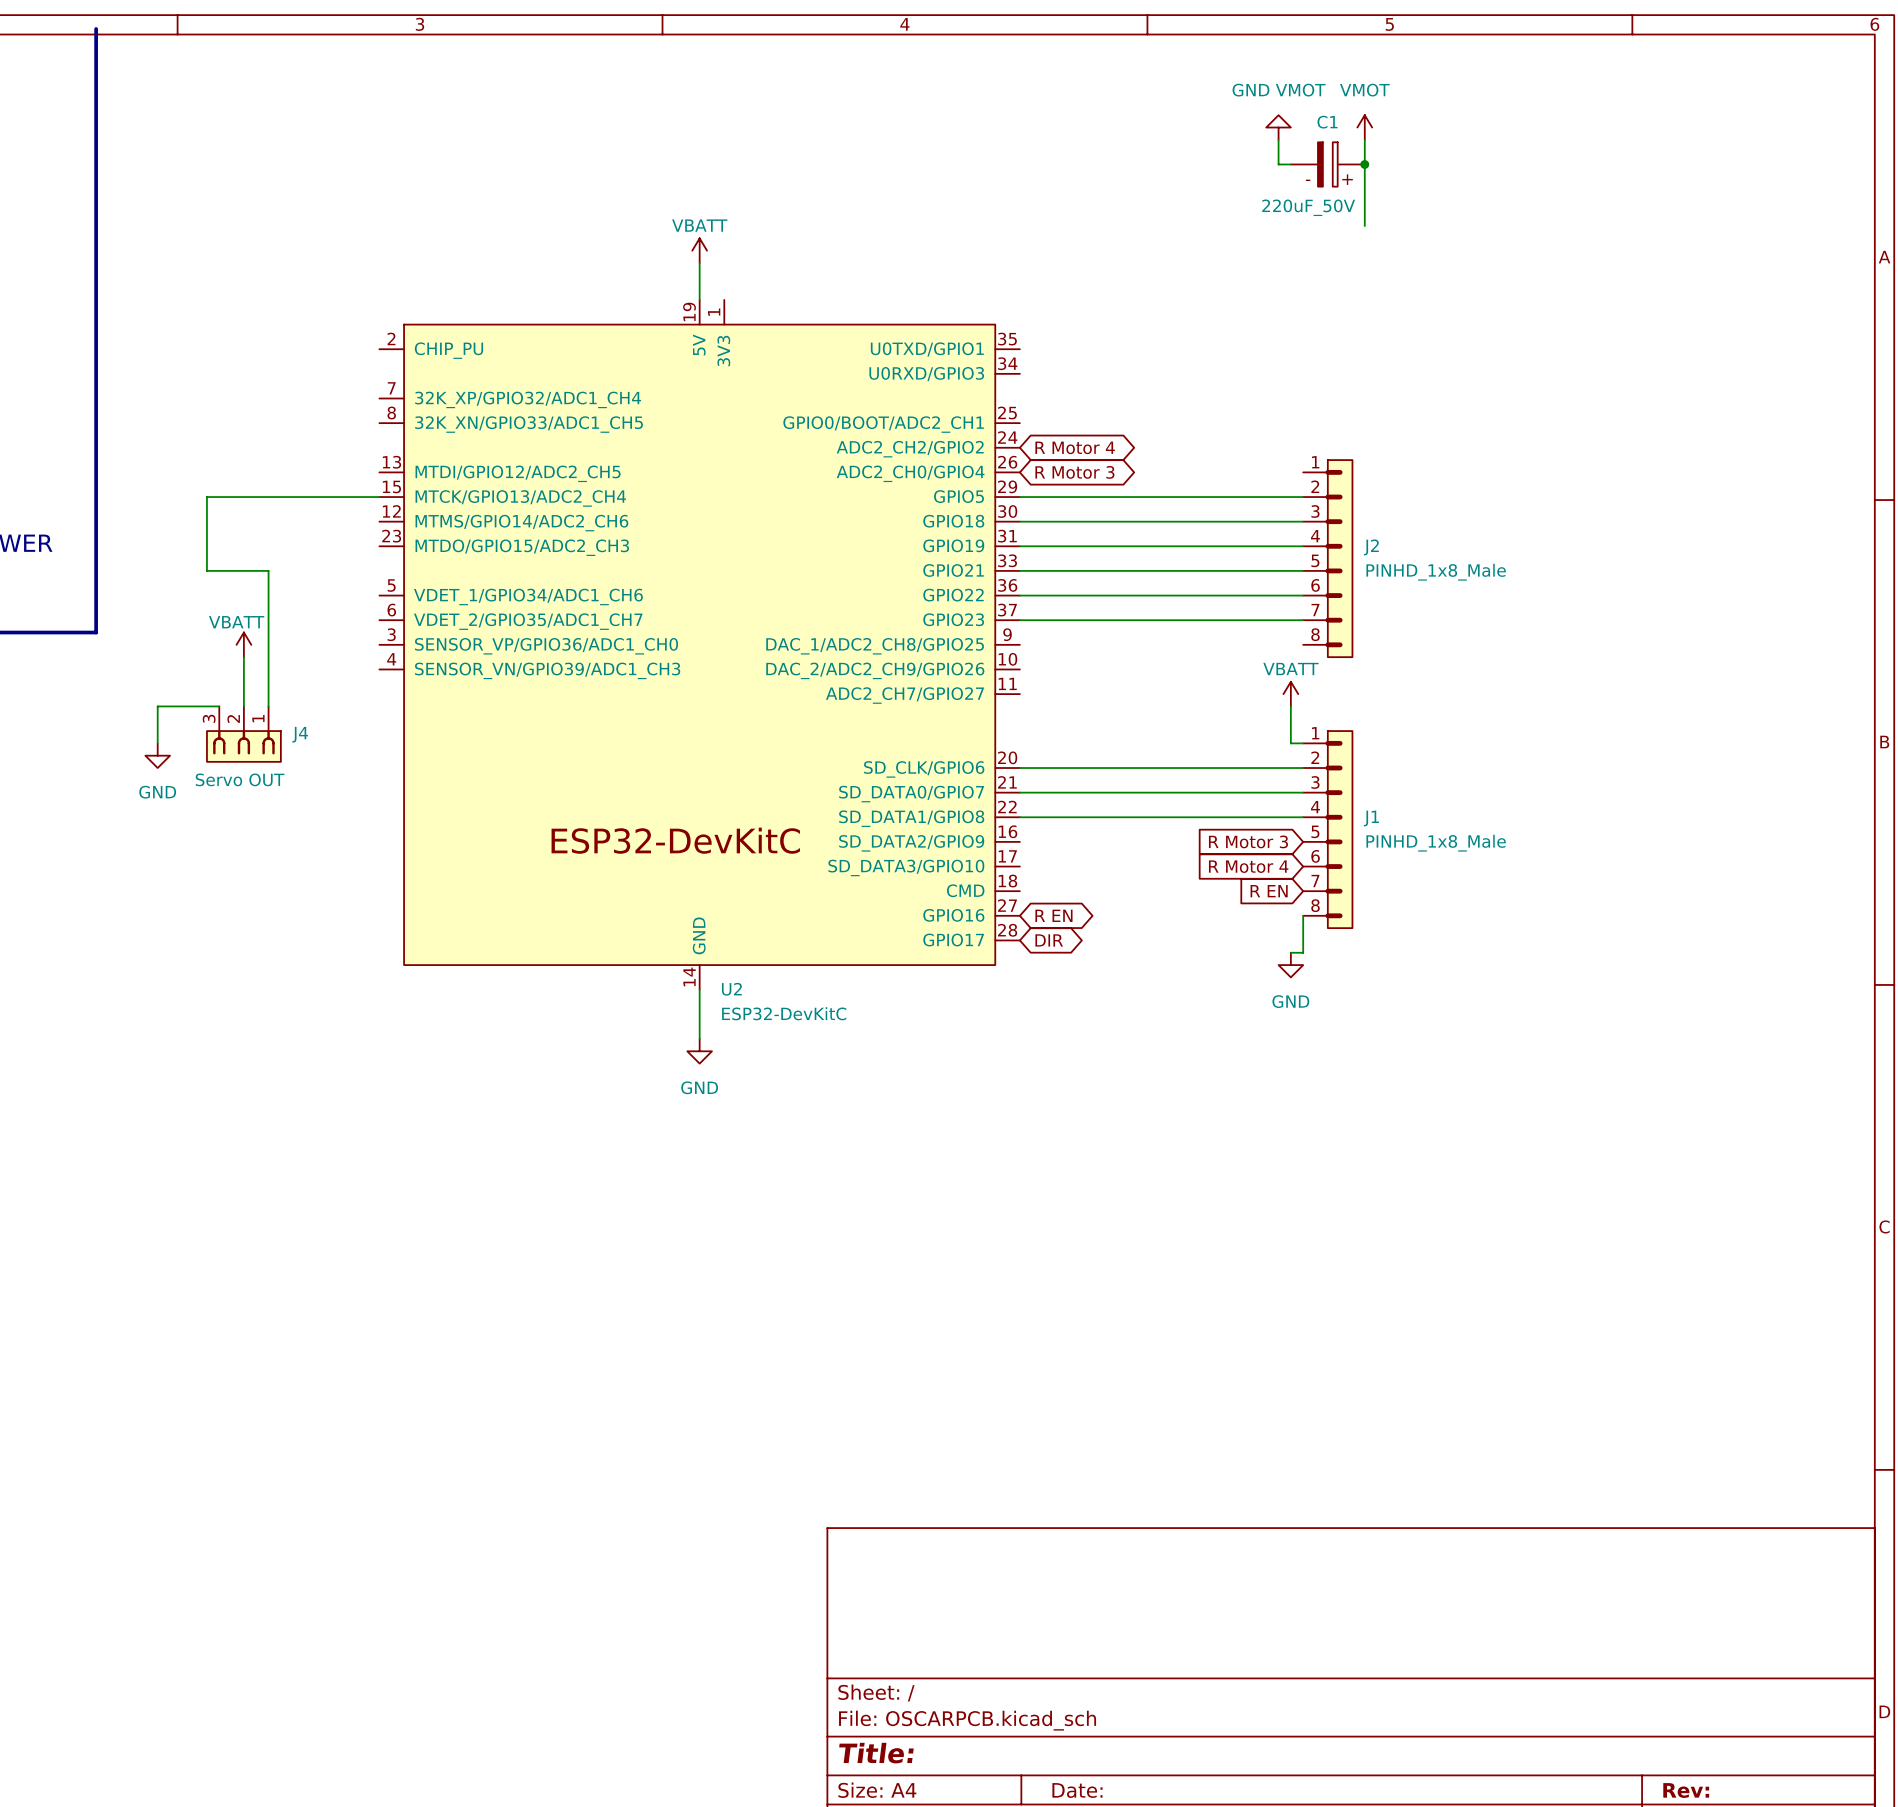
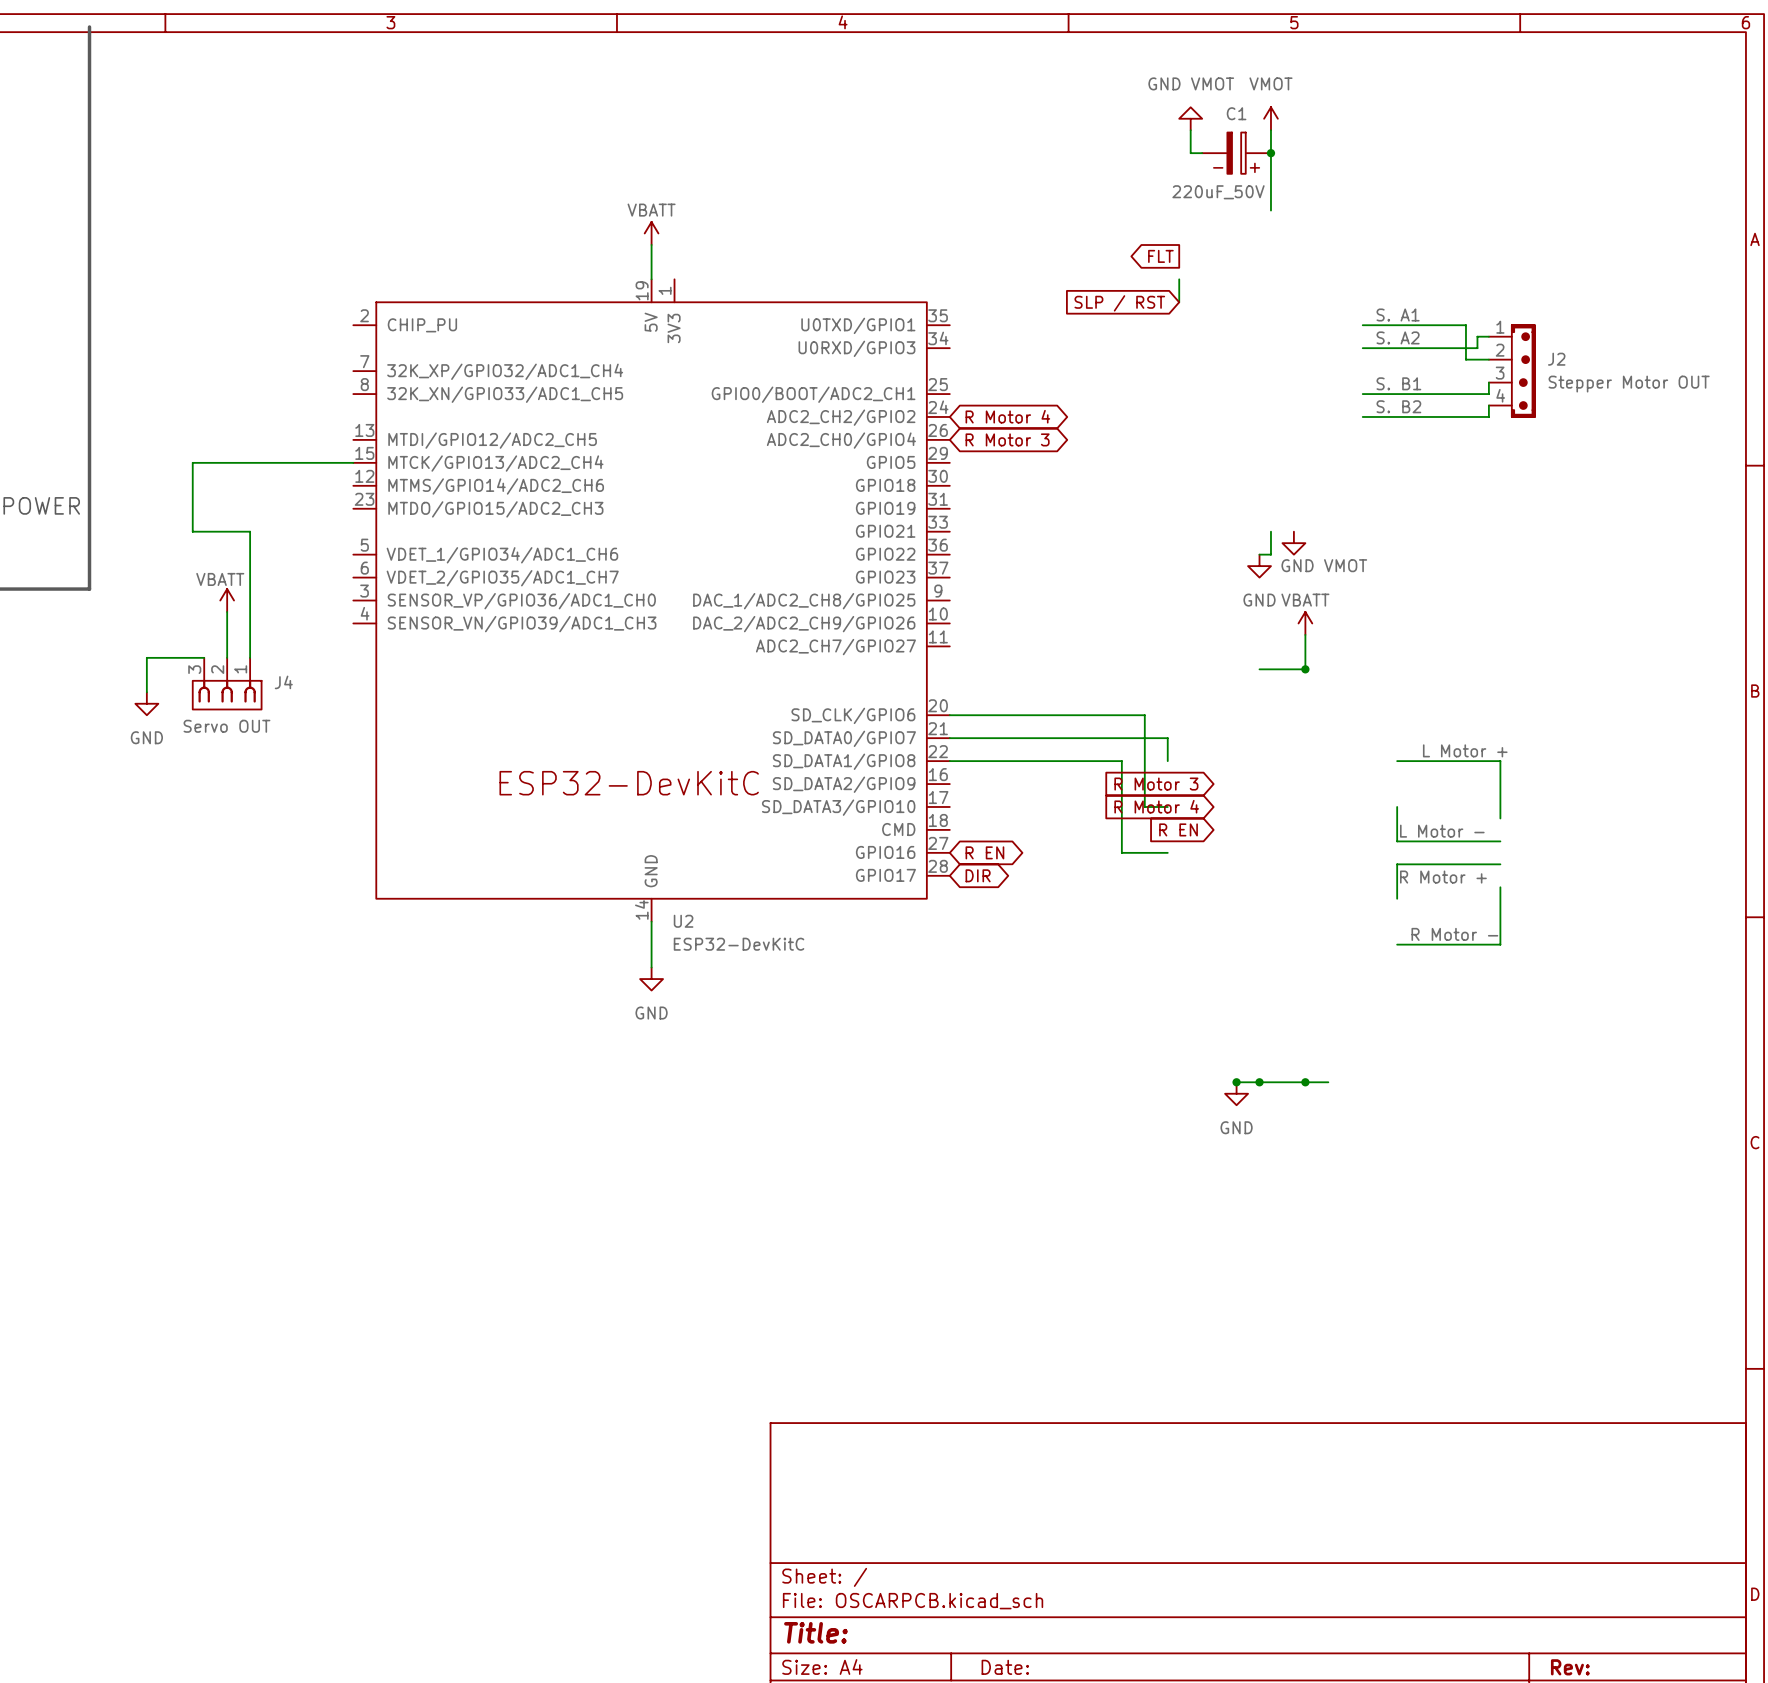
global label: none -> FLT (1160, 256)
wire: none -> (1179, 279) (1179, 302)
global label: none -> SLP / RST (1119, 303)
label: none -> S. A1 (1398, 314)
wire: none -> (1362, 325) (1465, 325) (1465, 359) (1488, 359)
wire: none -> (1488, 336) (1477, 336) (1477, 348) (1362, 348)
label: none -> S. A2 (1398, 337)
wire: none -> (1488, 382) (1488, 394) (1362, 394)
label: none -> S. B1 (1398, 383)
wire: none -> (1488, 405) (1488, 416) (1362, 416)
label: none -> S. B2 (1398, 406)
J2 symbol: [1303, 460, 1353, 658] -> [1488, 325, 1535, 417]
wire: (1019, 497) (1303, 497) -> none
wire: (1019, 521) (1303, 521) -> none
wire: (1019, 546) (1303, 546) -> none
wire: (1019, 570) (1303, 570) -> none
wire: none -> (1270, 531) (1270, 554) (1259, 554)
J2 value: PINHD_1x8_Male (1436, 572) -> Stepper Motor OUT (1629, 384)
power symbol: none -> GND VMOT (1293, 543)
wire: (1019, 595) (1303, 595) -> none
power symbol: none -> GND (1259, 566)
wire: (1019, 620) (1303, 620) -> none
wire: none -> (1305, 634) (1305, 669) (1259, 669)
power symbol position: VBATT (1290, 694) -> VBATT (1305, 623)
wire: (1290, 706) (1290, 743) (1303, 743) -> none
junction: none -> (1305, 669)
wire: (1229, 768) (1303, 768) -> (1144, 715) (1144, 806) (1167, 806)
wire: (1253, 792) (1303, 792) -> (1167, 738) (1167, 761)
label: none -> L Motor + (1465, 750)
wire: (1204, 817) (1303, 817) -> (1121, 761) (1121, 852) (1167, 852)
wire: none -> (1397, 761) (1500, 761) (1500, 818)
J1: PINHD_1x8_Male (1327, 829) -> none
wire: none -> (1397, 806) (1397, 841) (1500, 841)
label: none -> L Motor - (1442, 831)
wire: (1303, 915) (1303, 952) (1290, 952) -> none
wire: none -> (1500, 864) (1397, 864) (1397, 898)
label: none -> R Motor + (1443, 877)
wire: none -> (1500, 887) (1500, 944) (1397, 944)
power symbol: GND (1290, 965) -> none
label: none -> R Motor - (1454, 934)
wire: none -> (1236, 1082) (1328, 1082)
junction: none -> (1236, 1082)
junction: none -> (1259, 1082)
junction: none -> (1305, 1082)
power symbol: none -> GND (1236, 1093)

